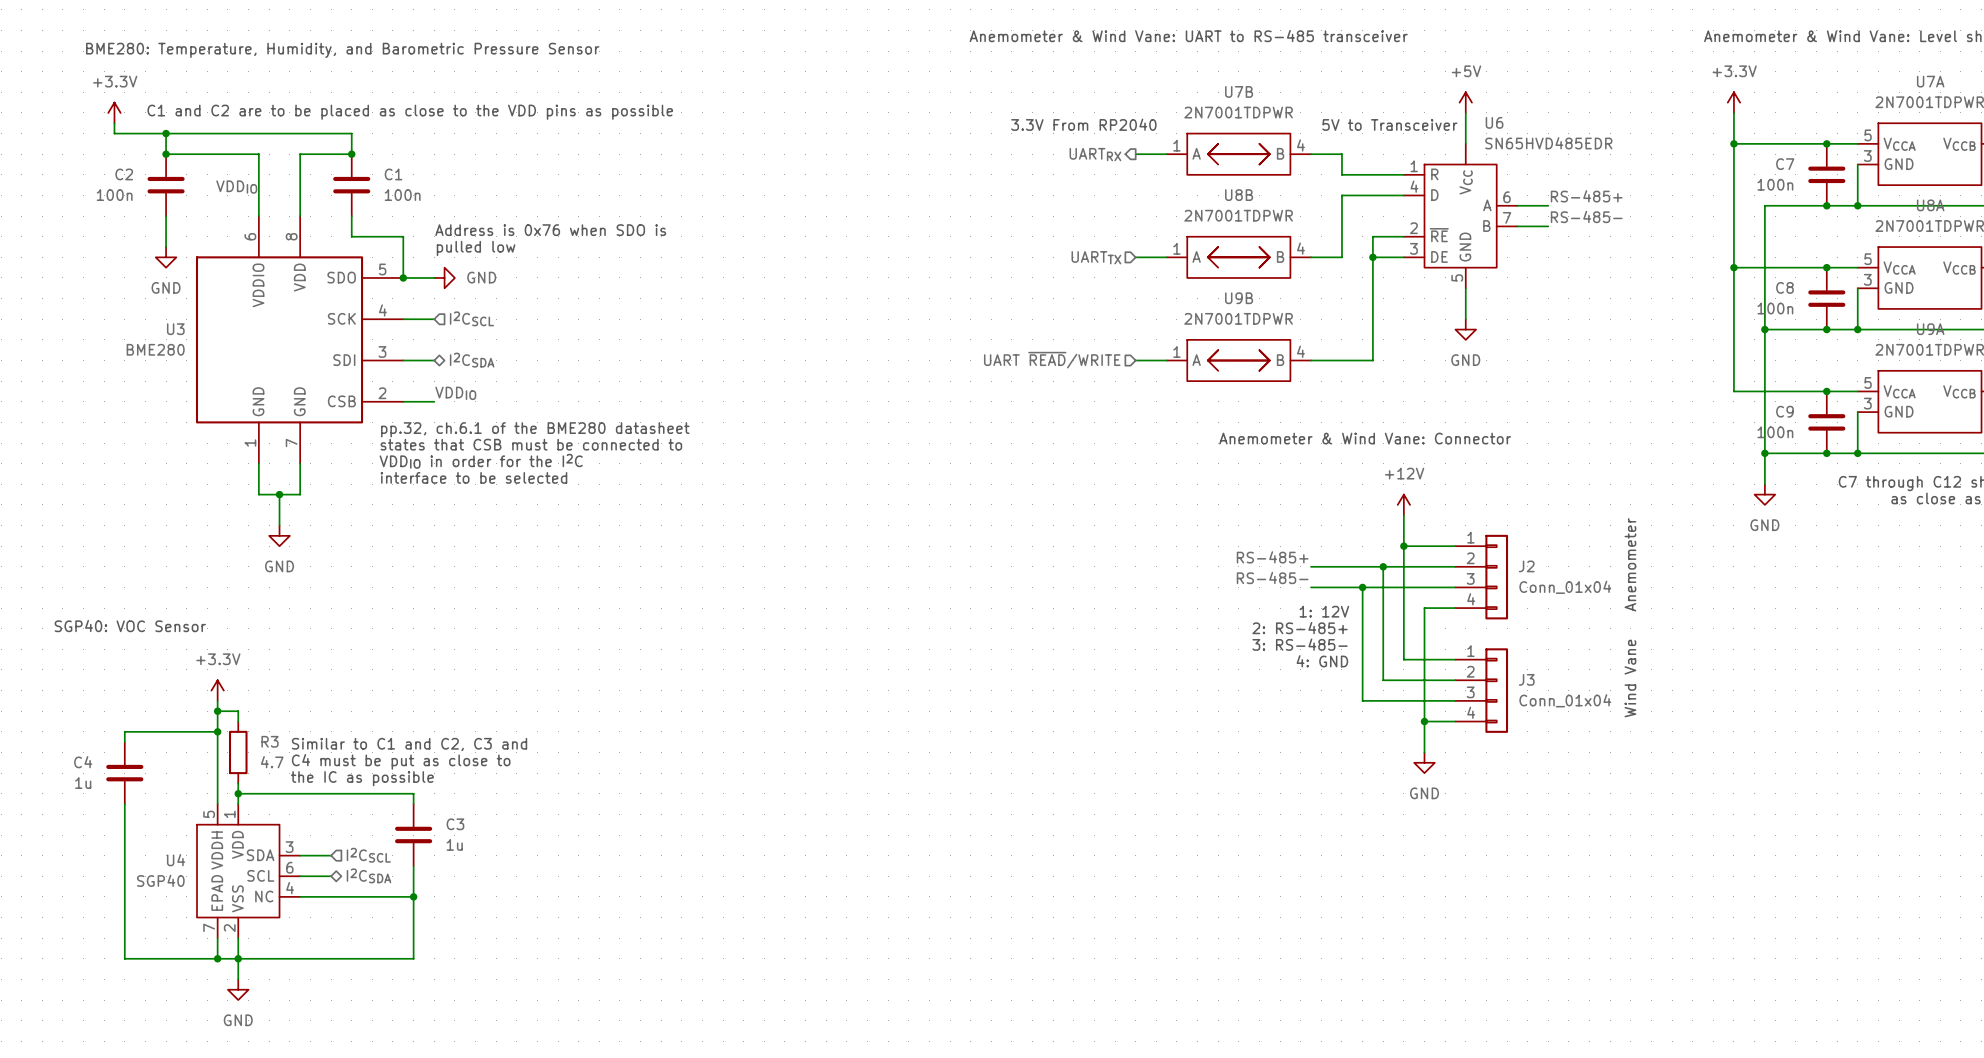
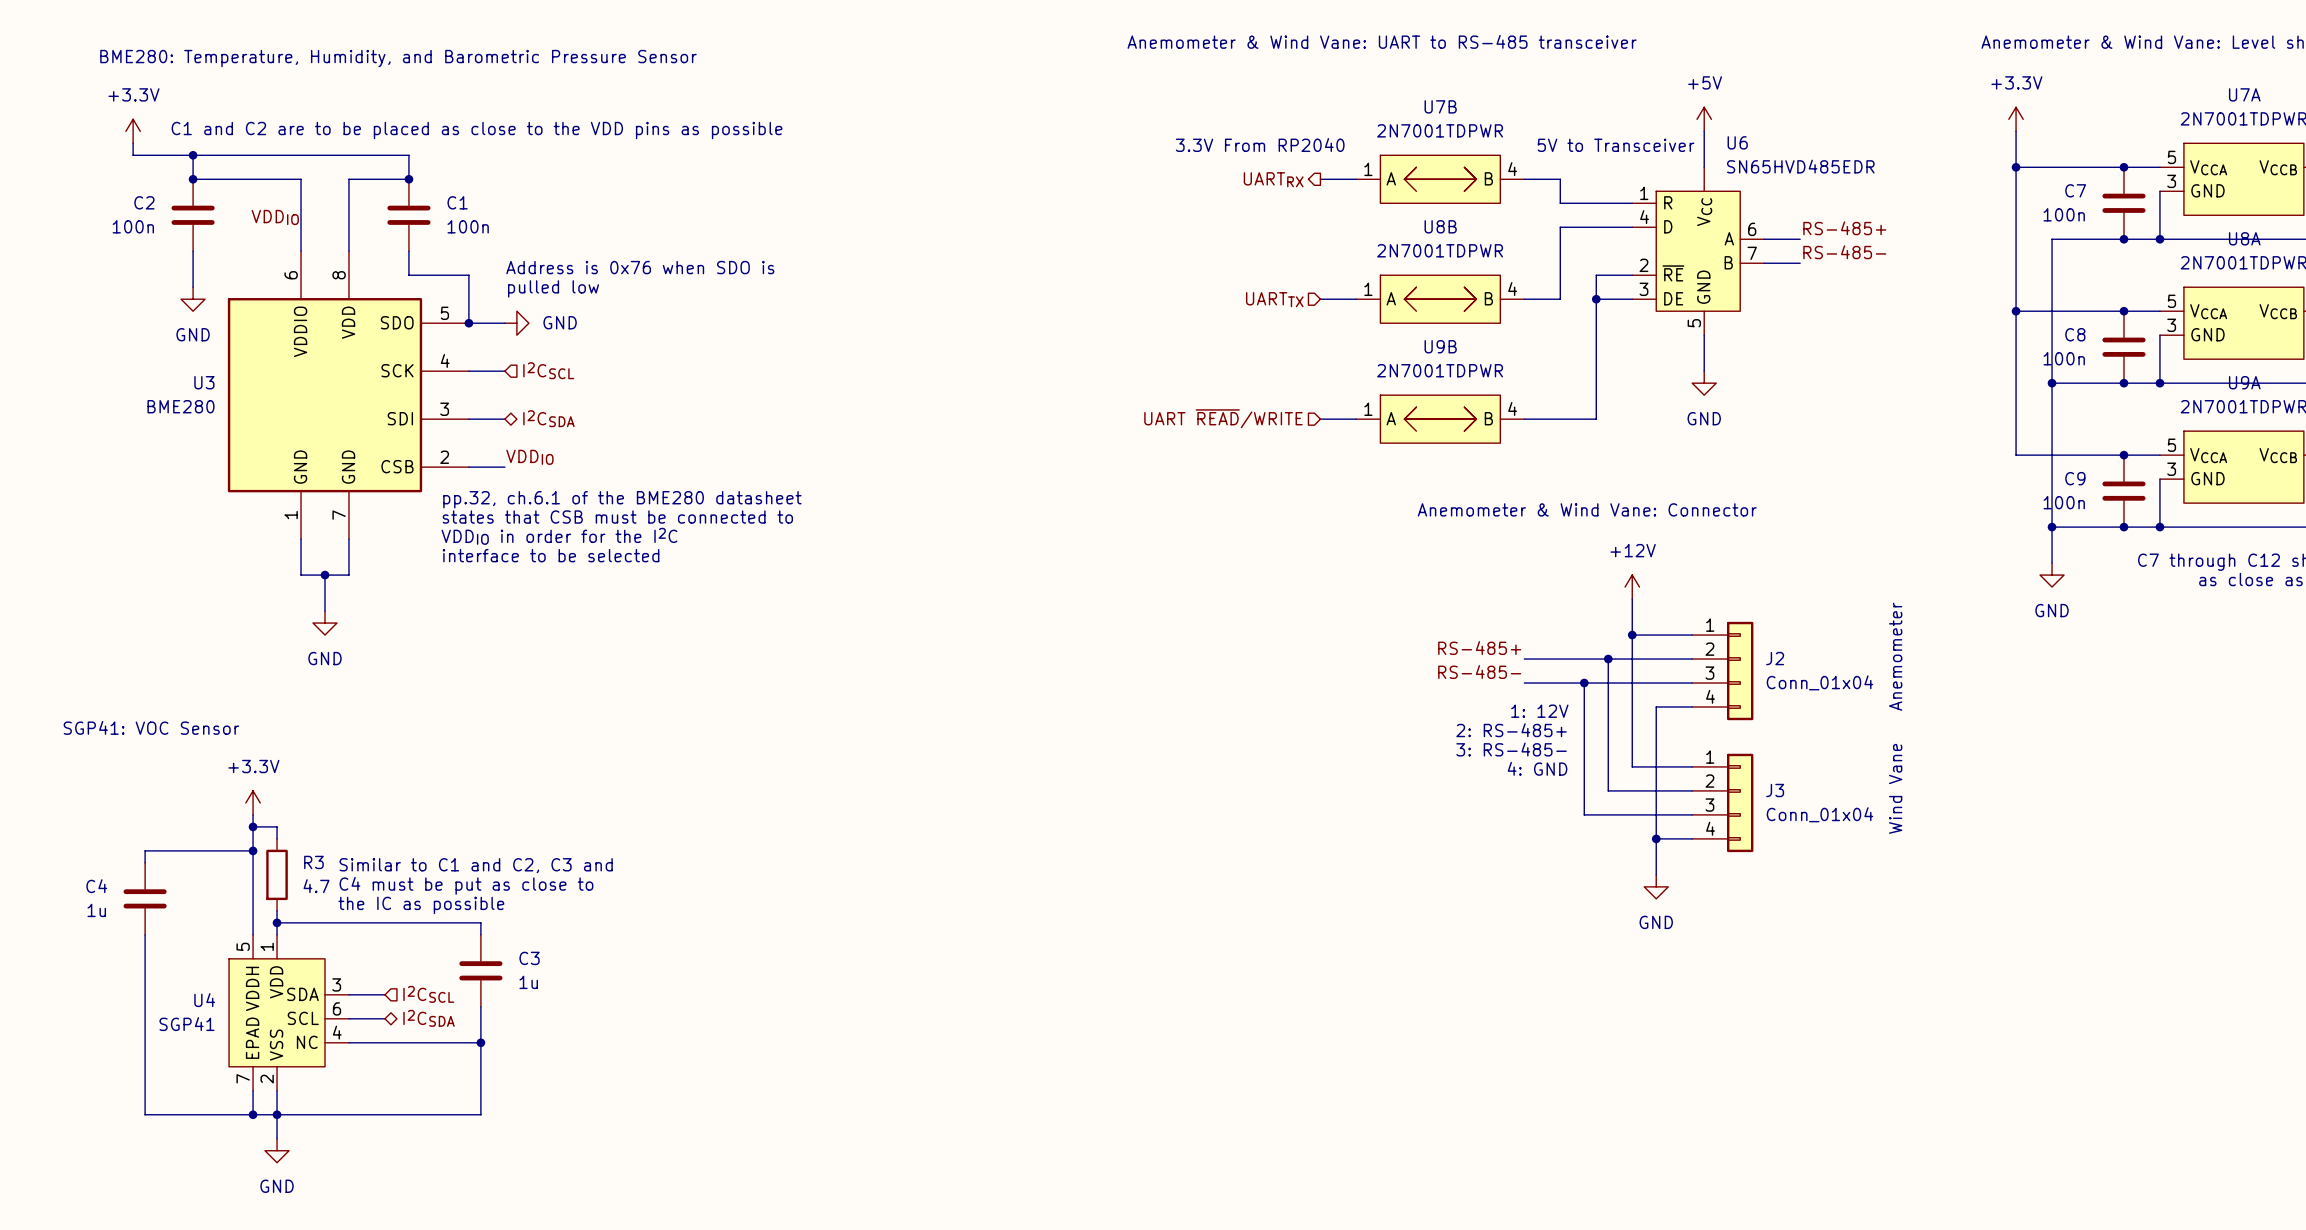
text: SGP40: VOC Sensor (130, 626) -> SGP41: VOC Sensor (151, 727)
U4 value: SGP40 (160, 880) -> SGP41 (186, 1024)

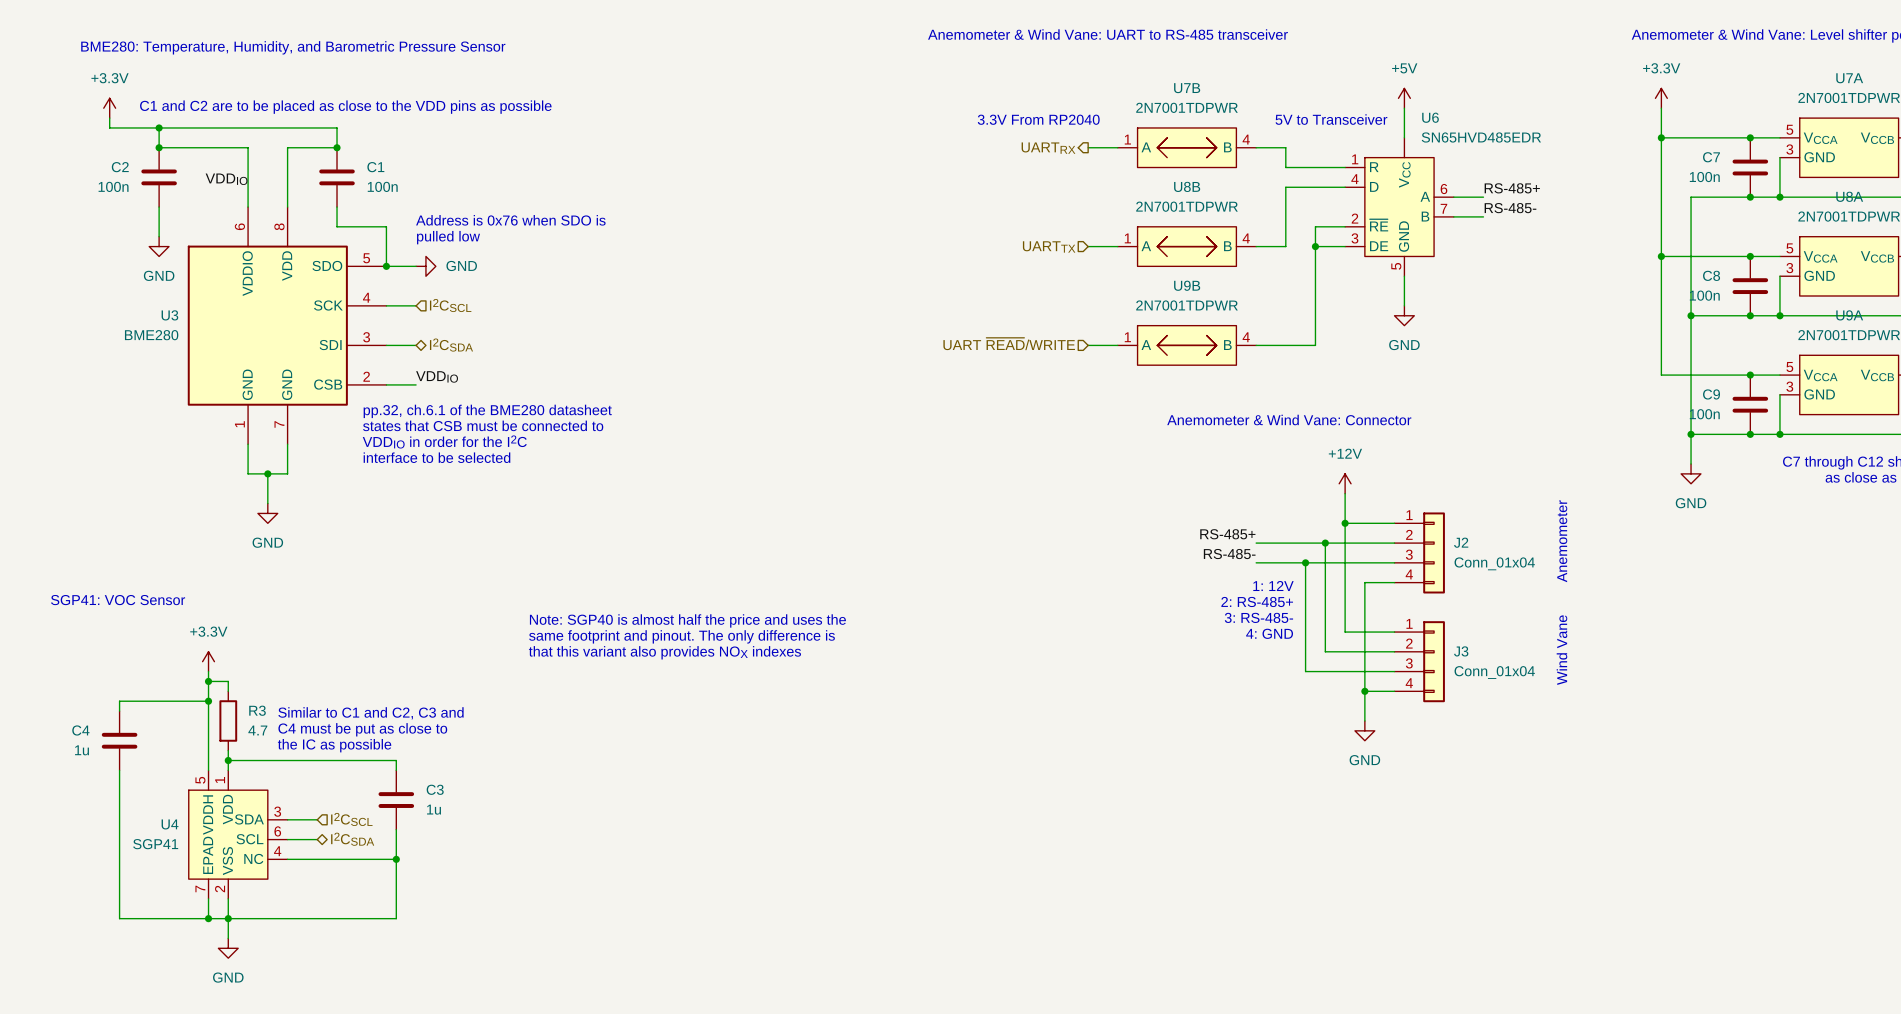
text: none -> Note: SGP40 is almost half the price and uses the (687, 620)
text: none -> same footprint and pinout. The only difference is (682, 636)
text: none -> that this variant also provides NOX indexes (664, 652)

